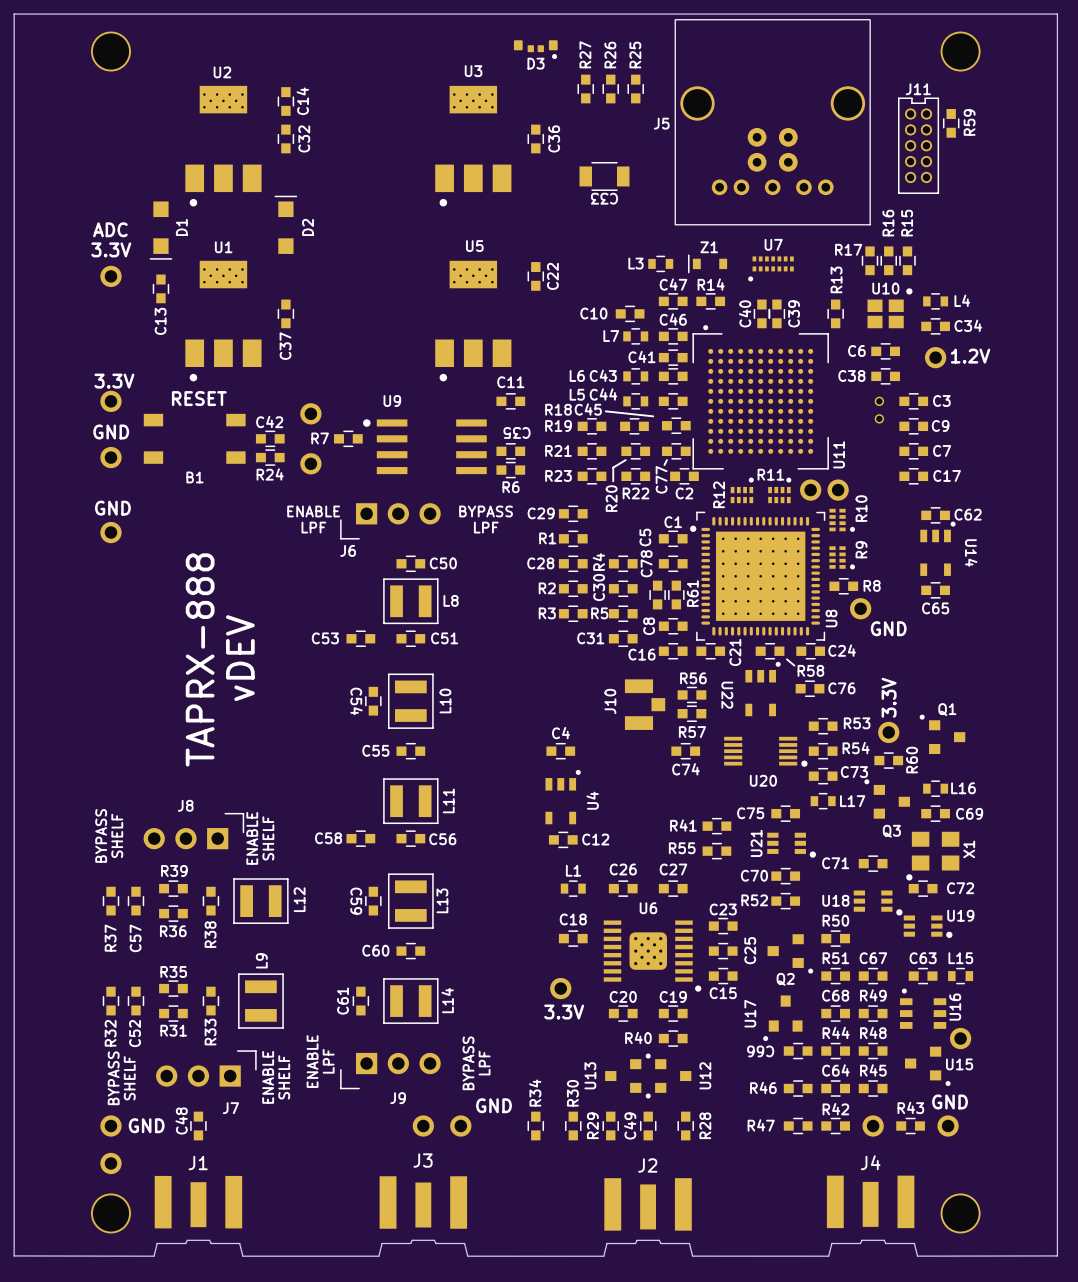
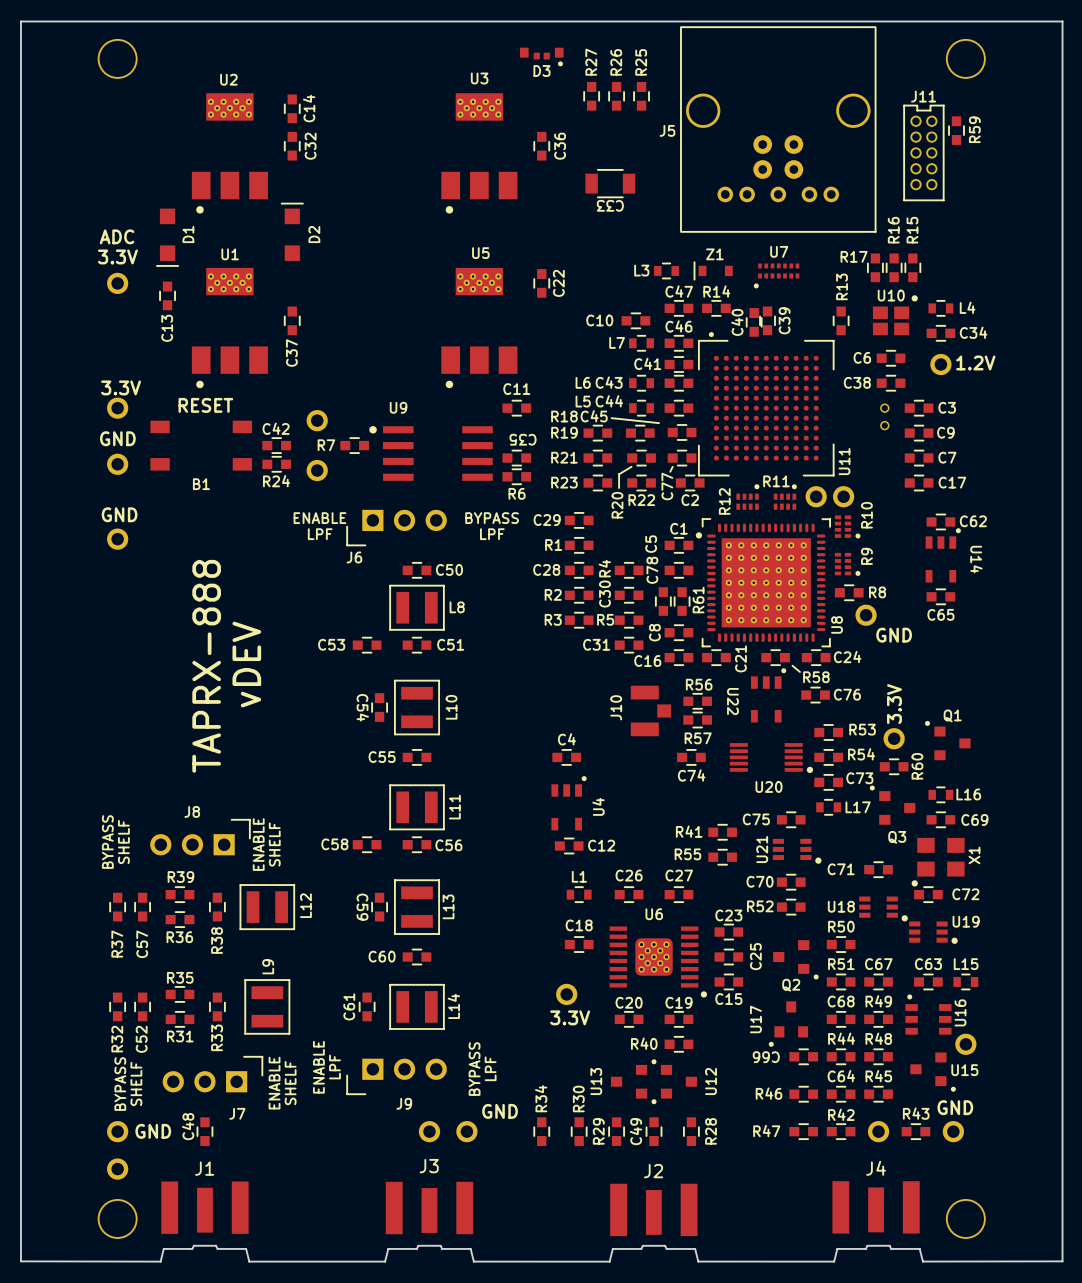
C40 name: C40 (745, 313) -> C39 (784, 320)
C39: (776, 313) -> none
C40: none -> (754, 322)

